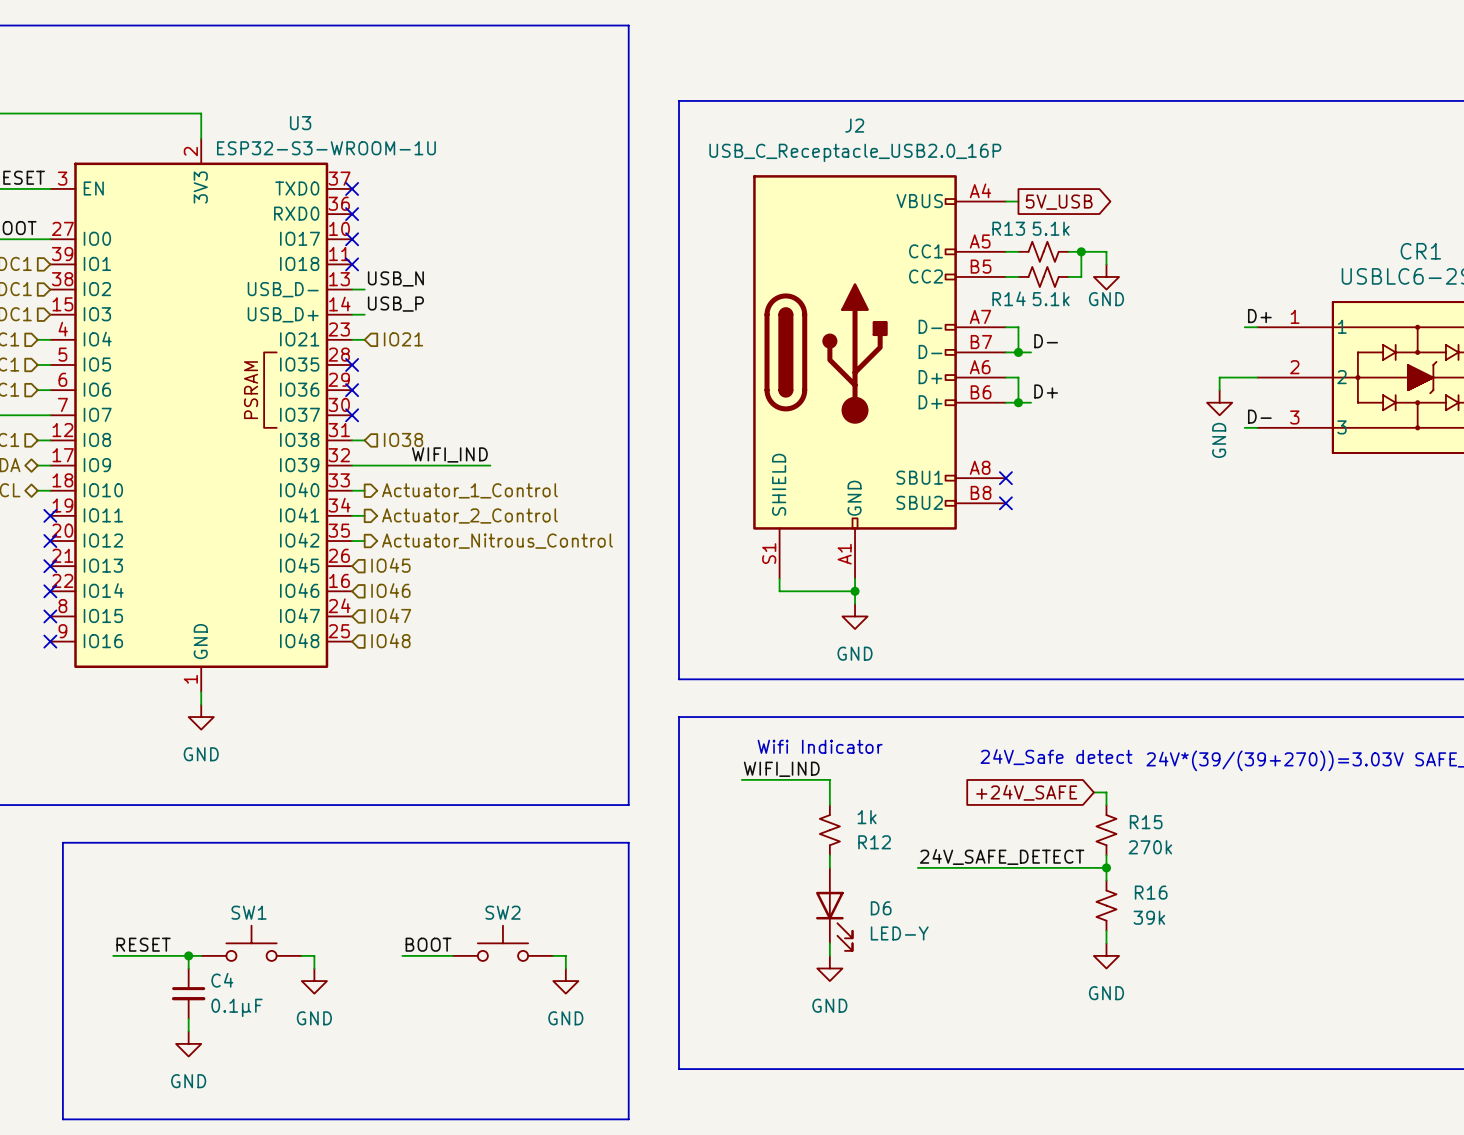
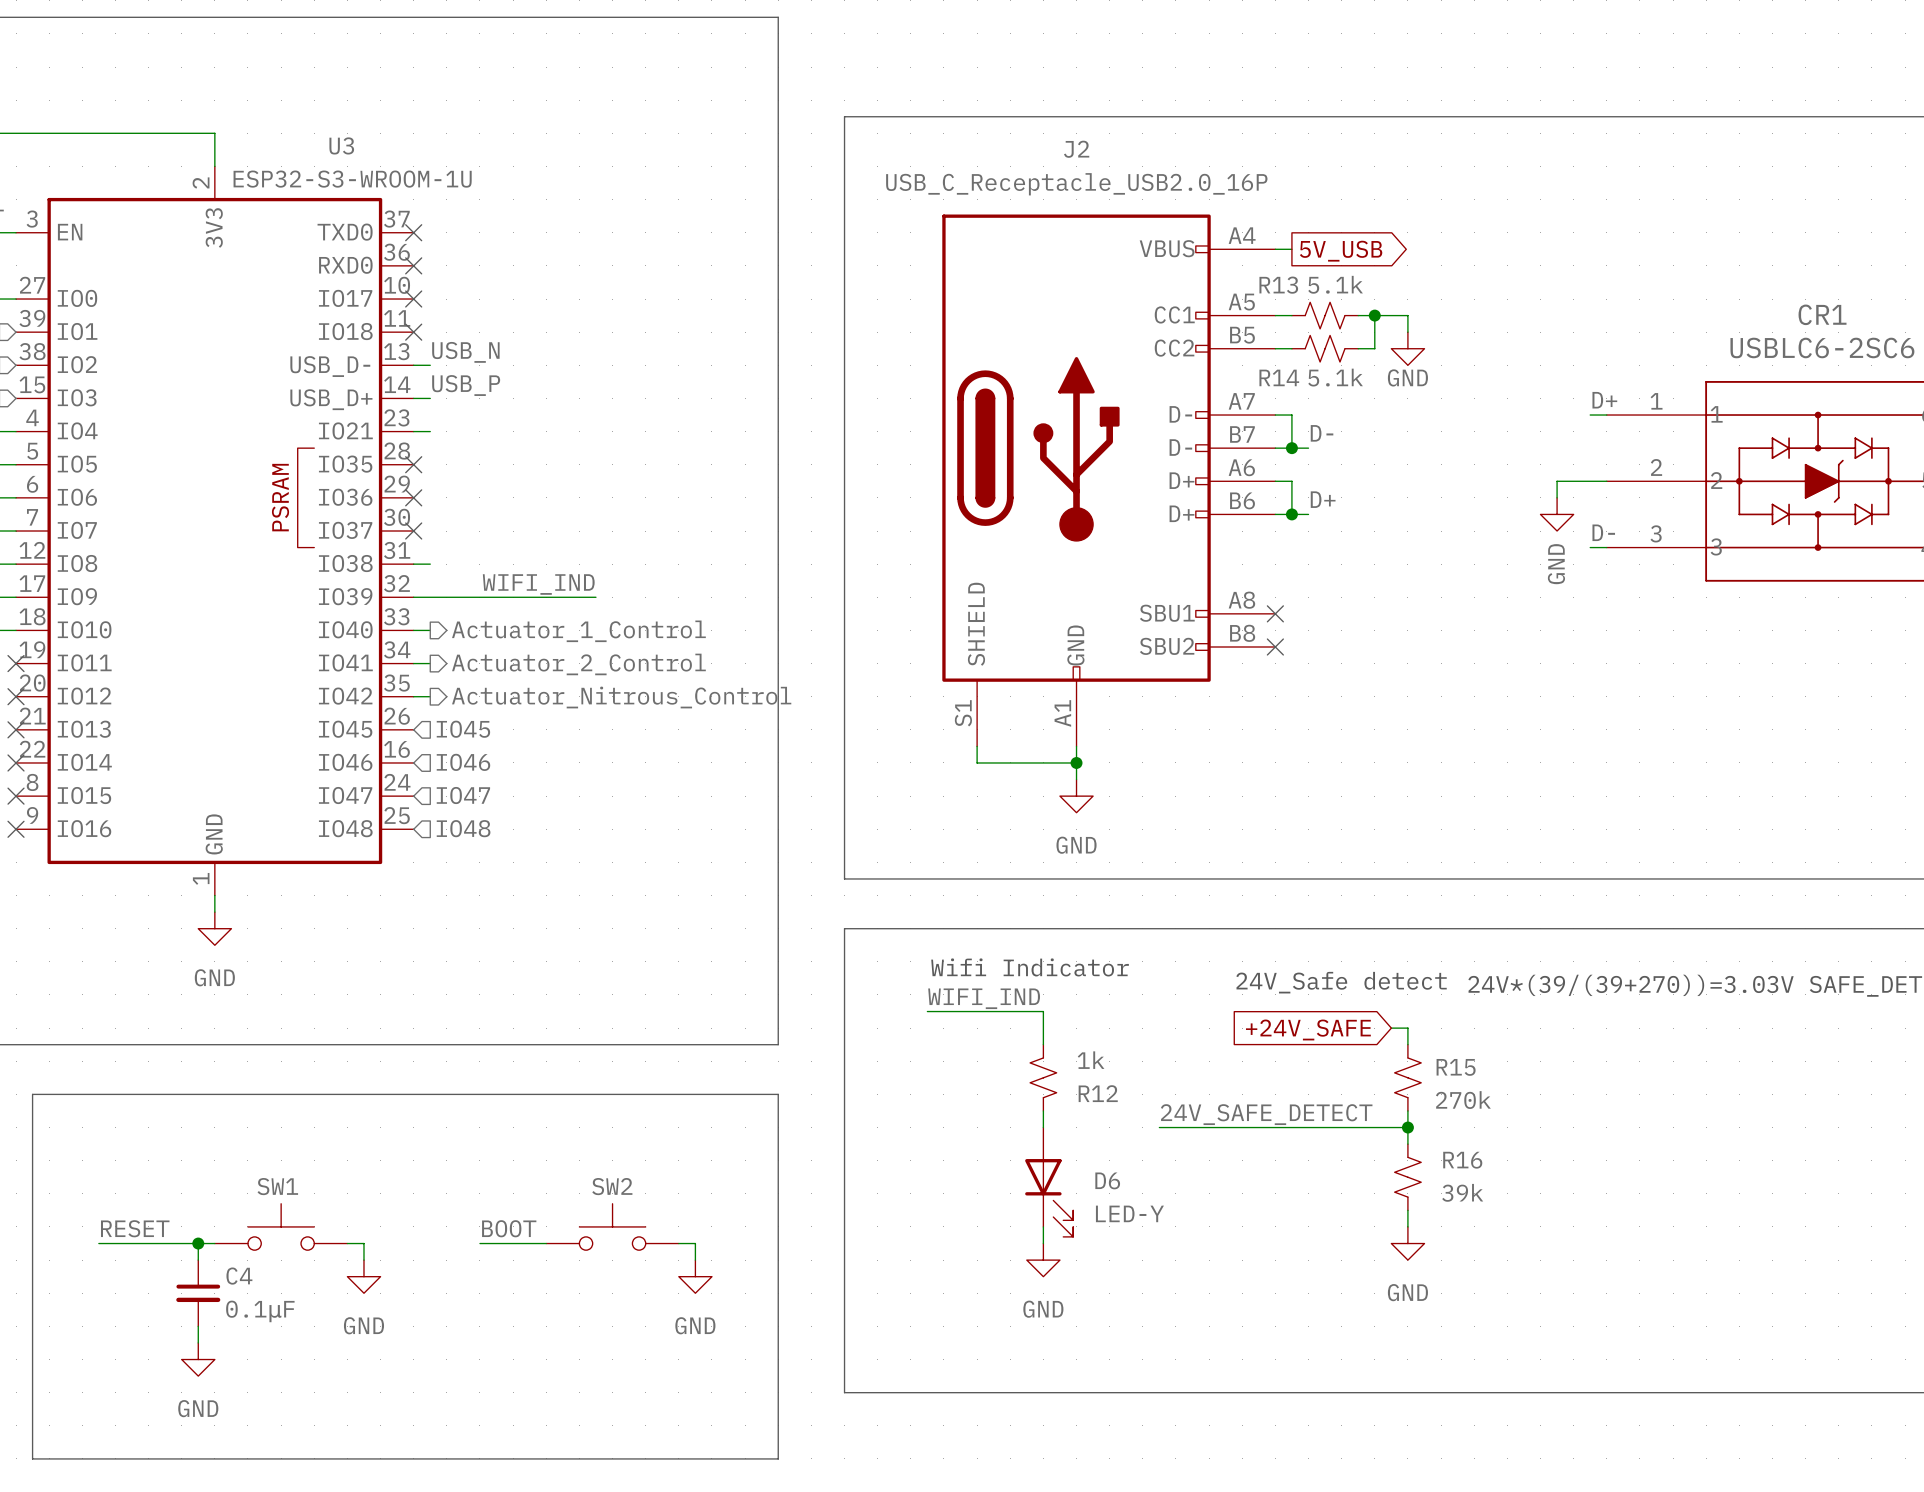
hierarchical label: IO21 (403, 339) -> none
hierarchical label: IO38 (403, 439) -> none

